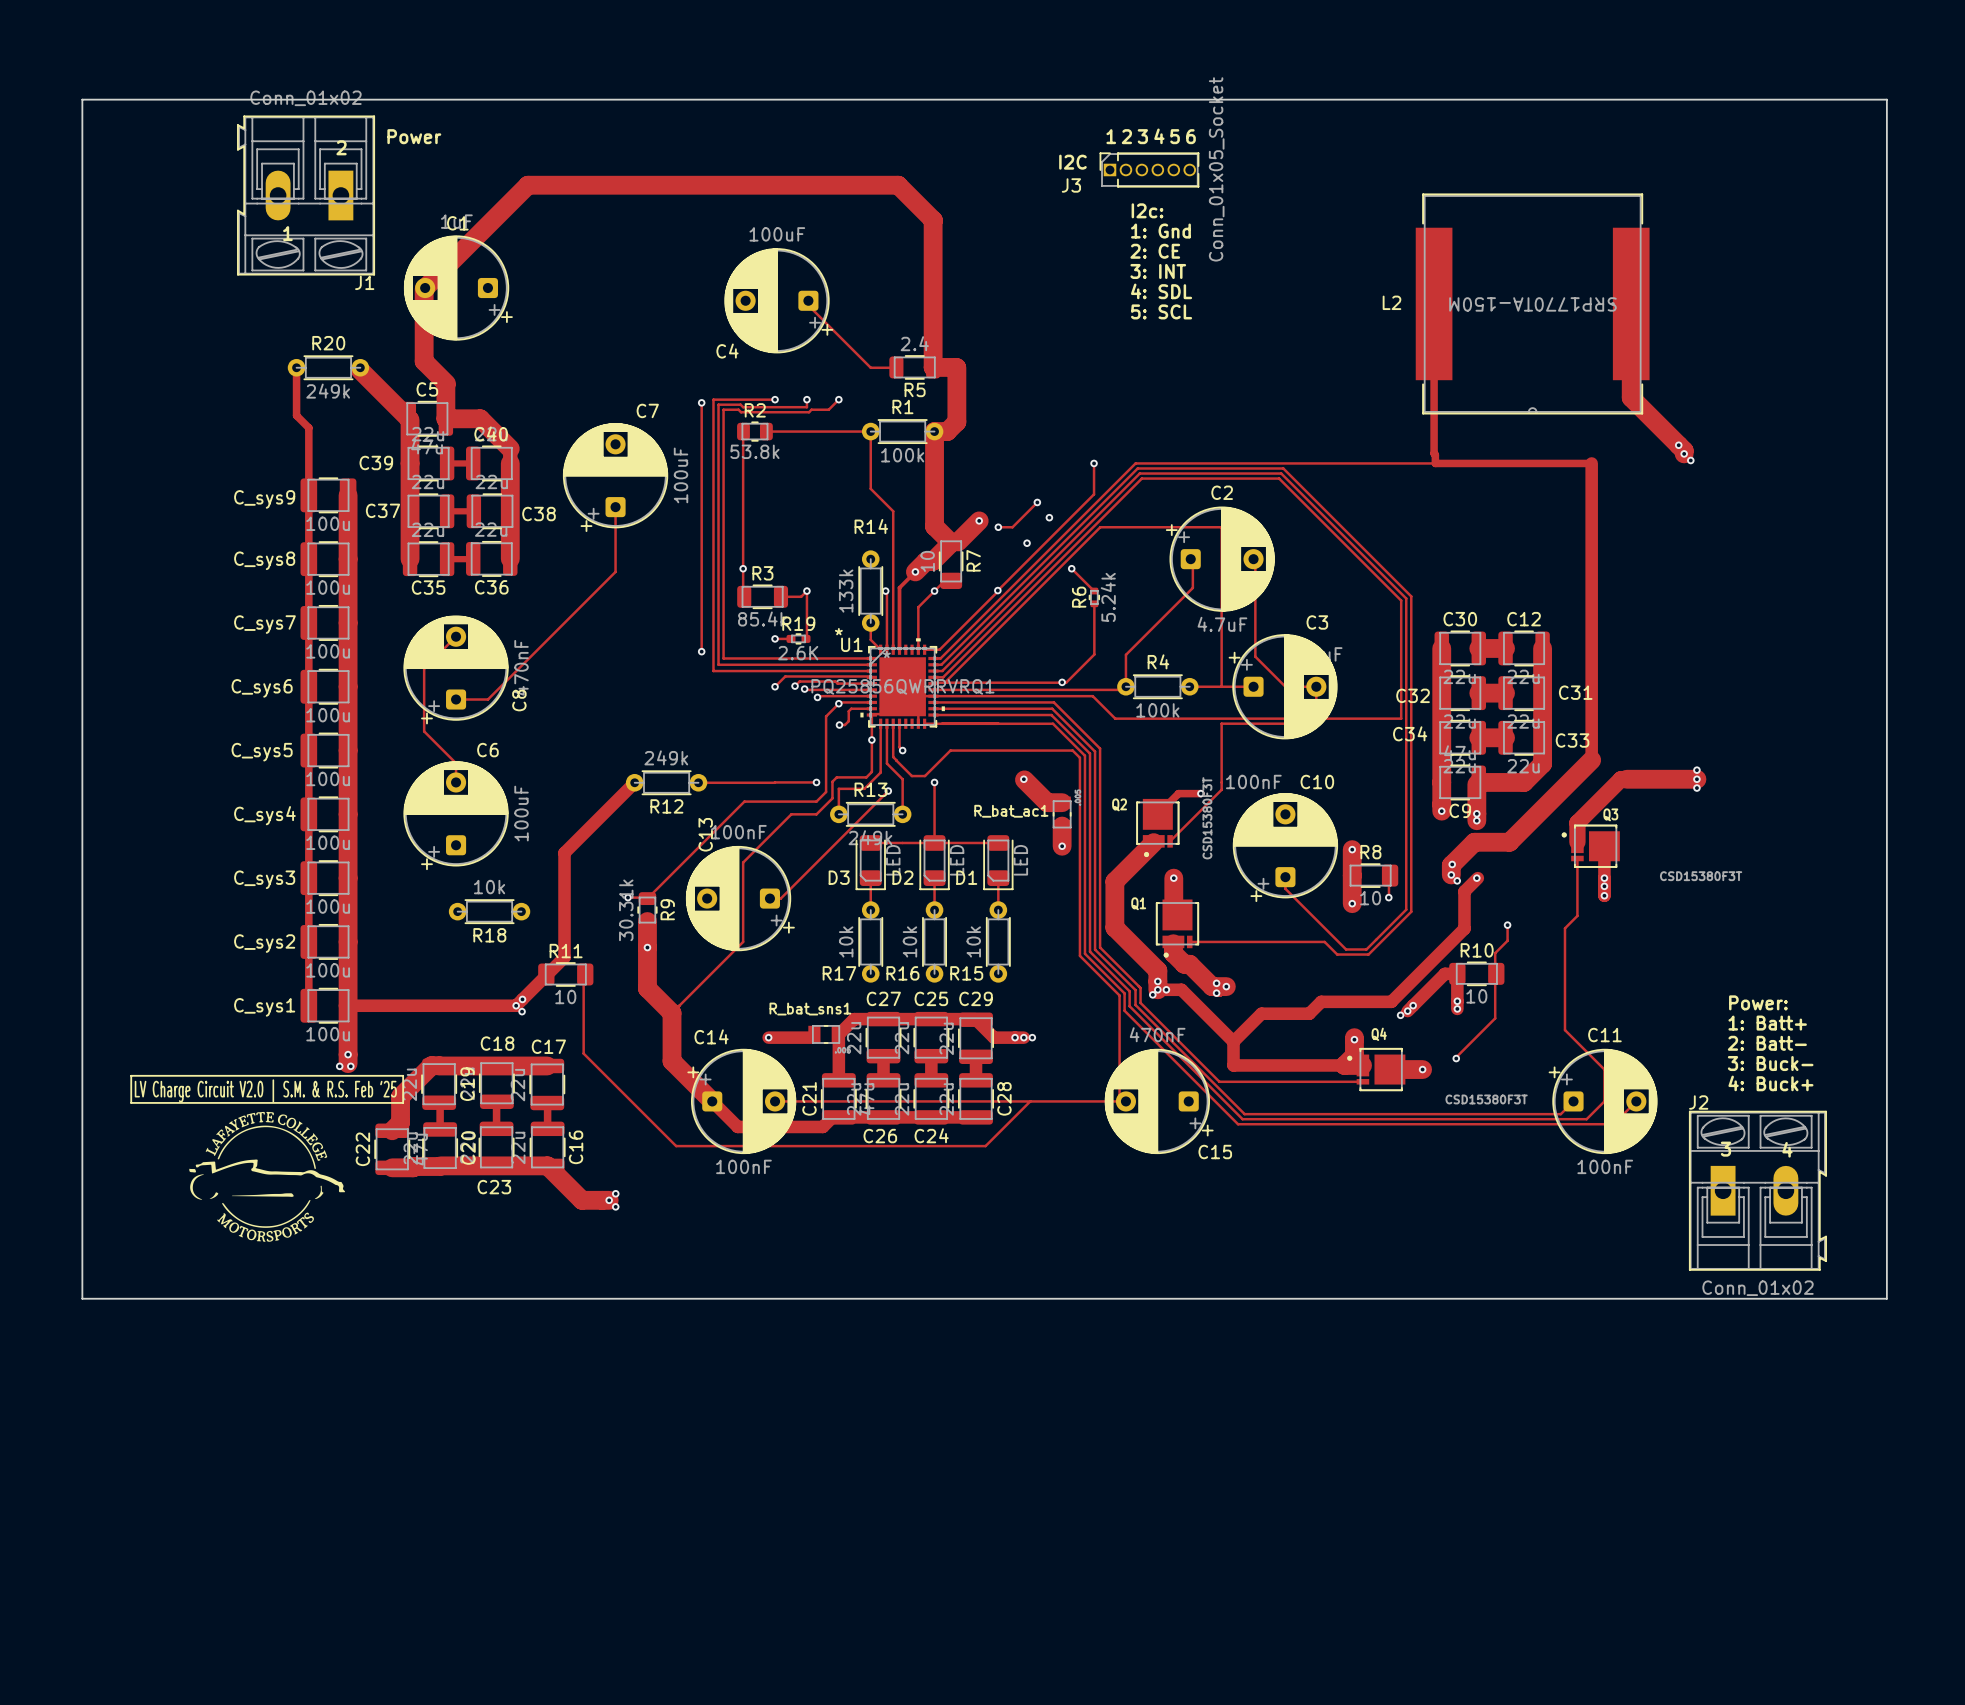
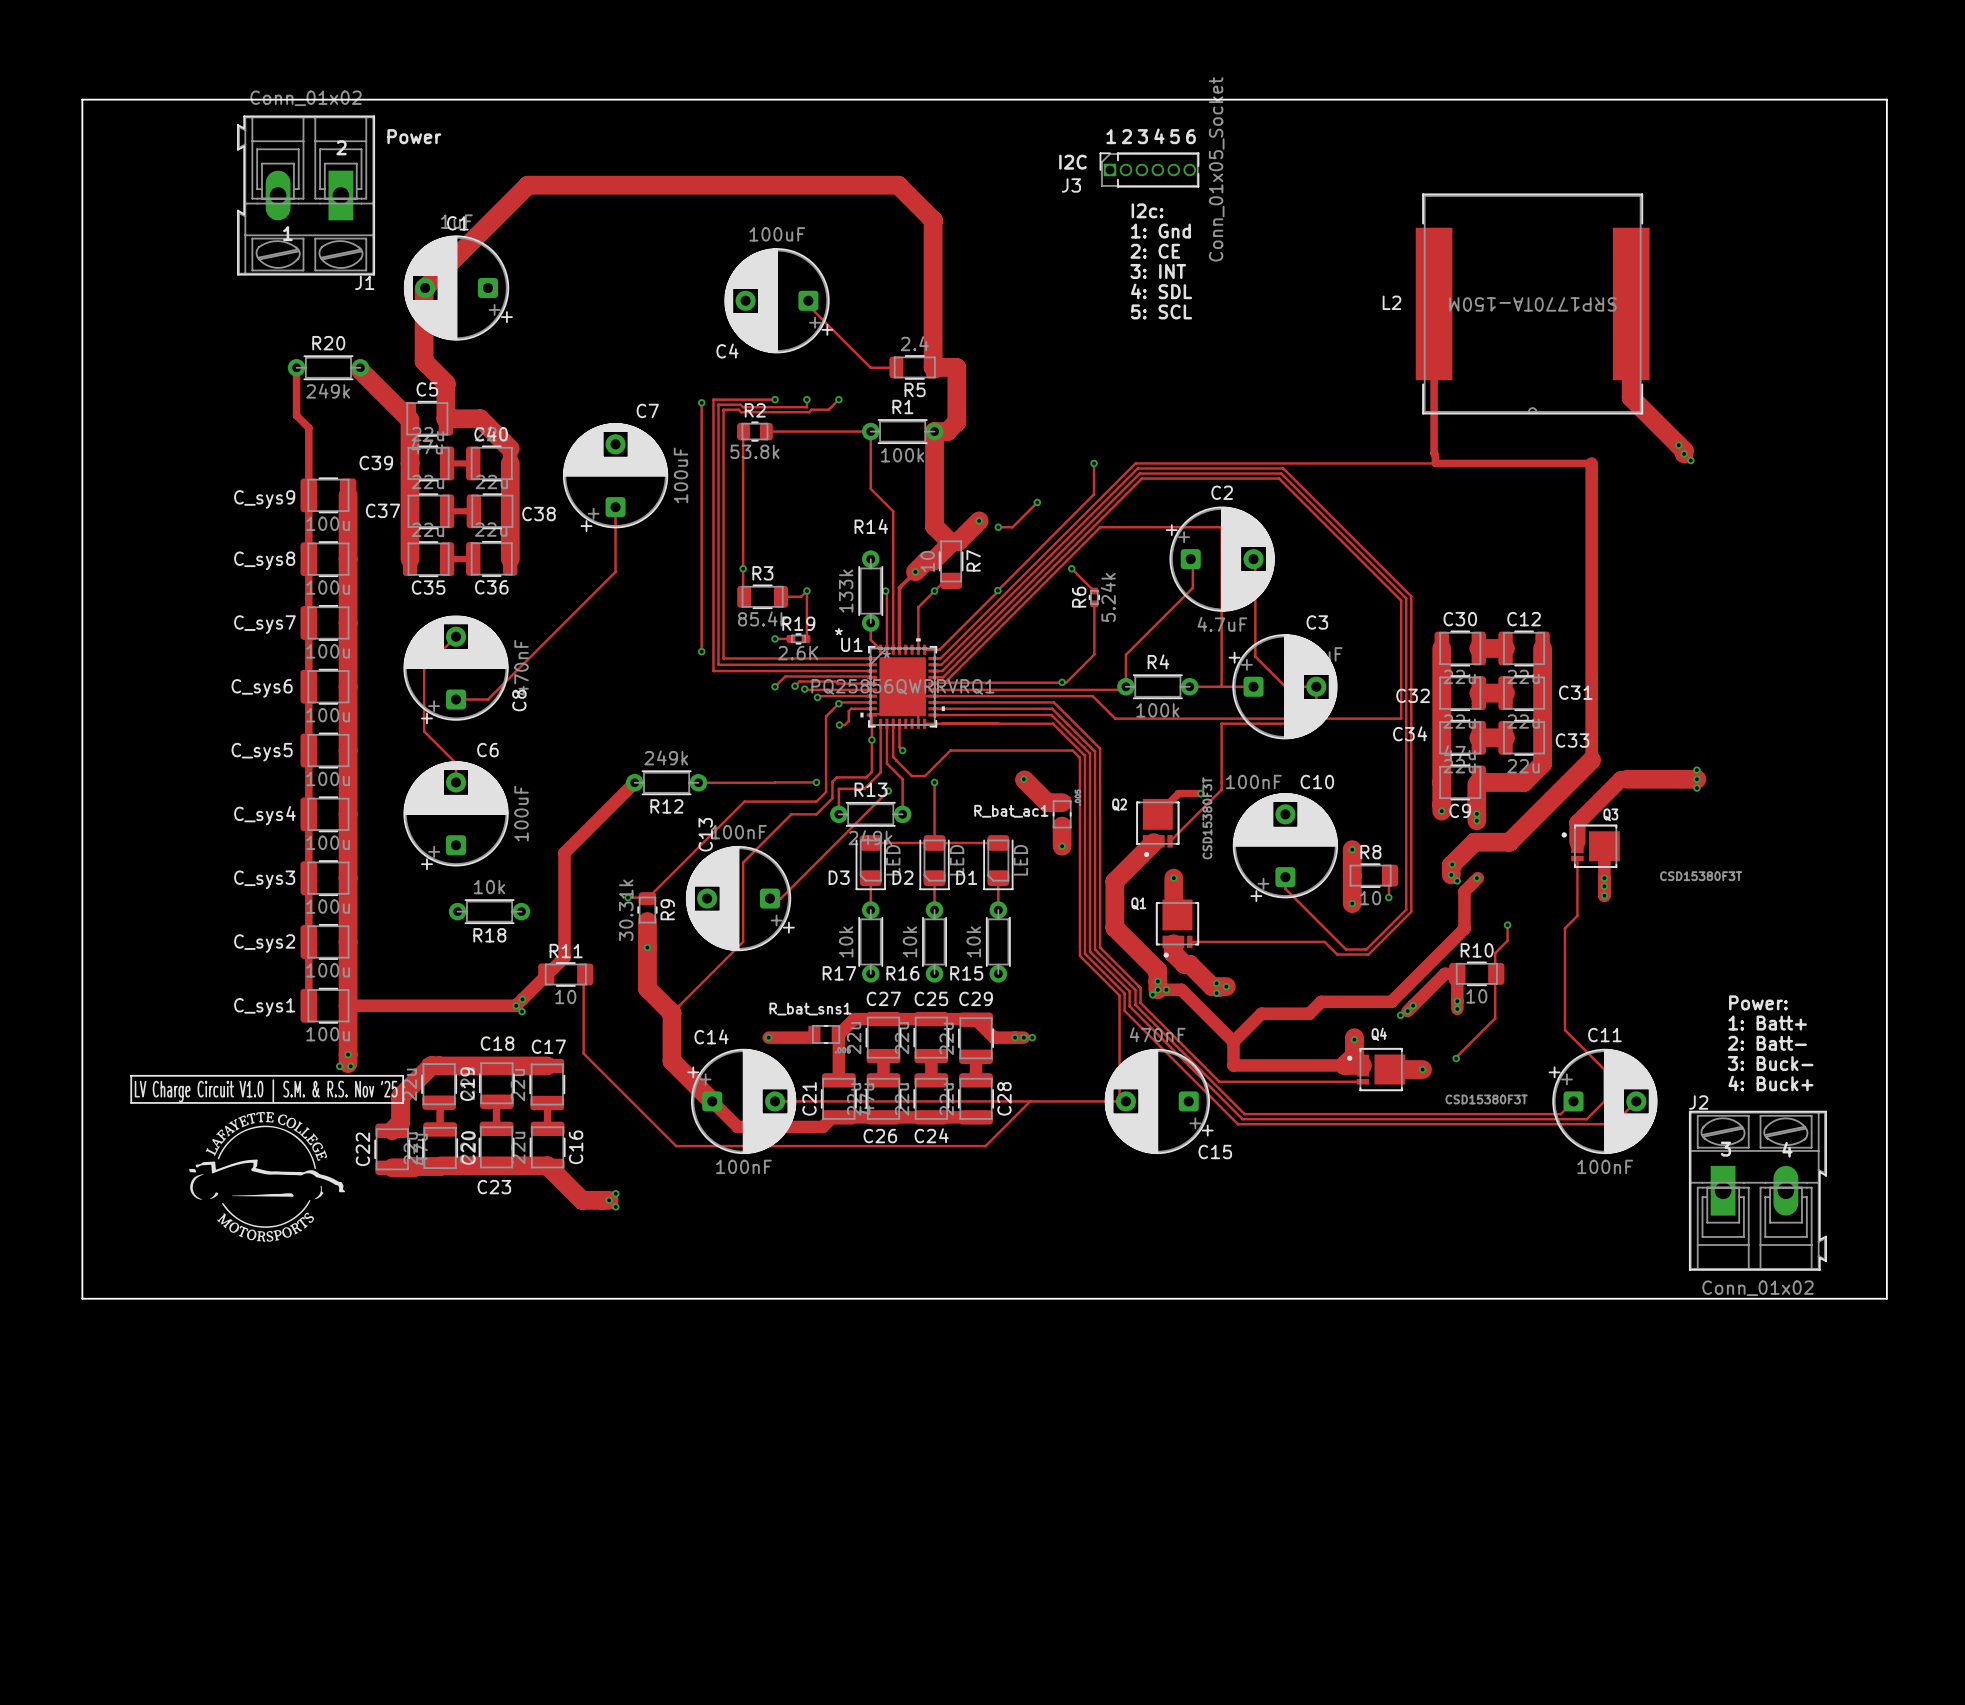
via: (1049, 517) -> none
via: (1027, 543) -> none
text: LV Charge Circuit V2.0 | S.M. & R.S. Feb '25 (265, 1090) -> LV Charge Circuit V1.0 | S.M. & R.S. Nov '25 (266, 1090)

